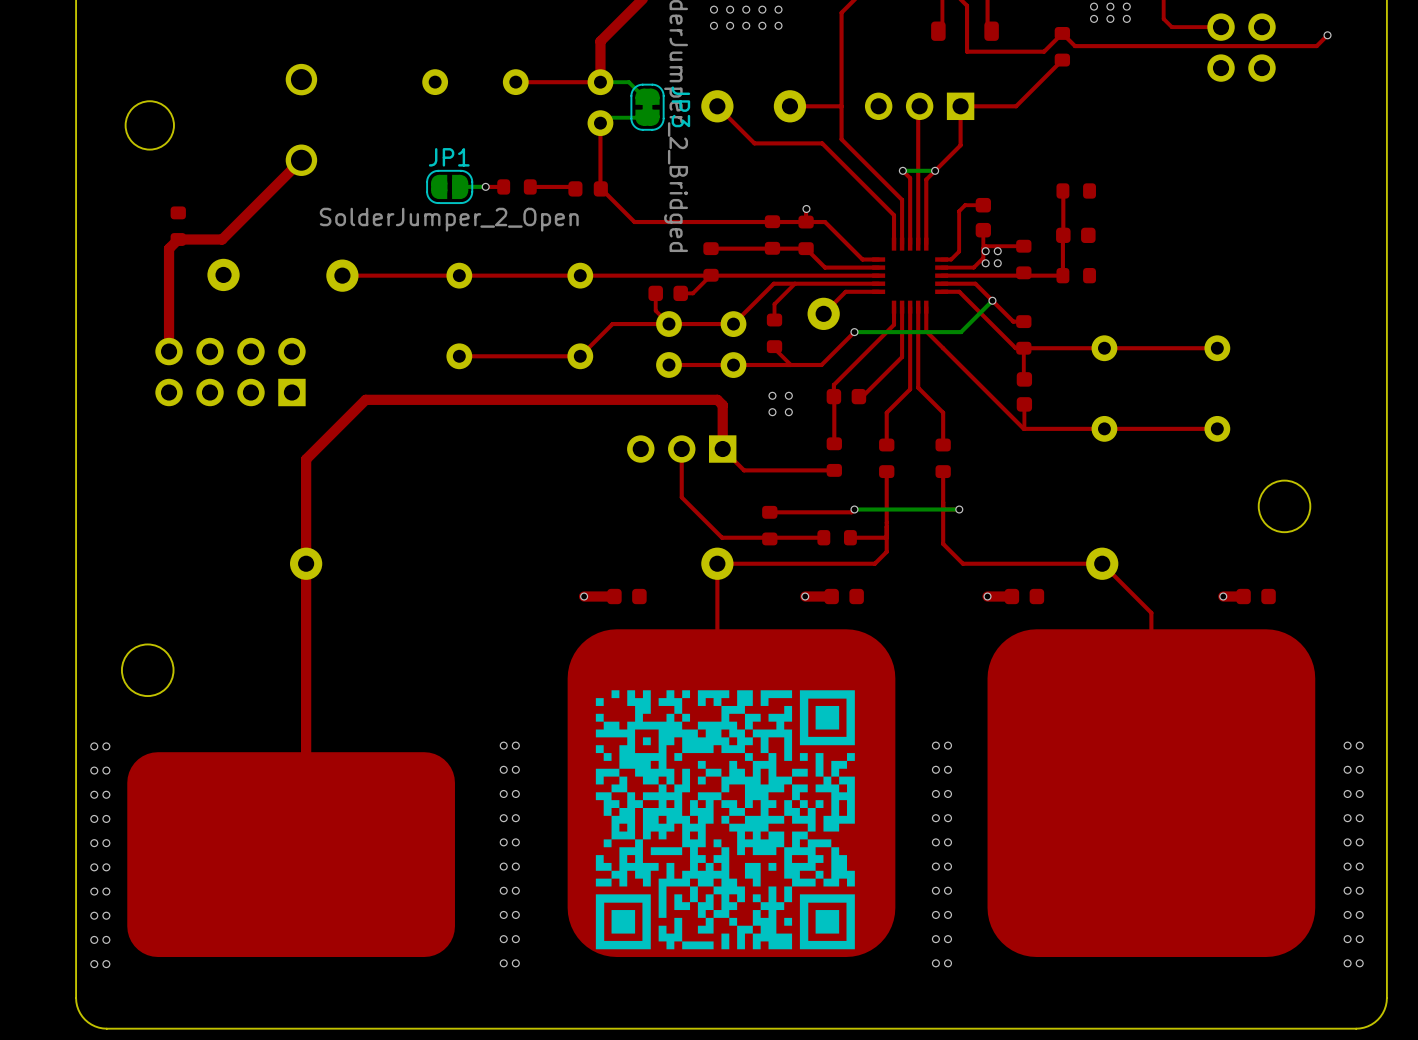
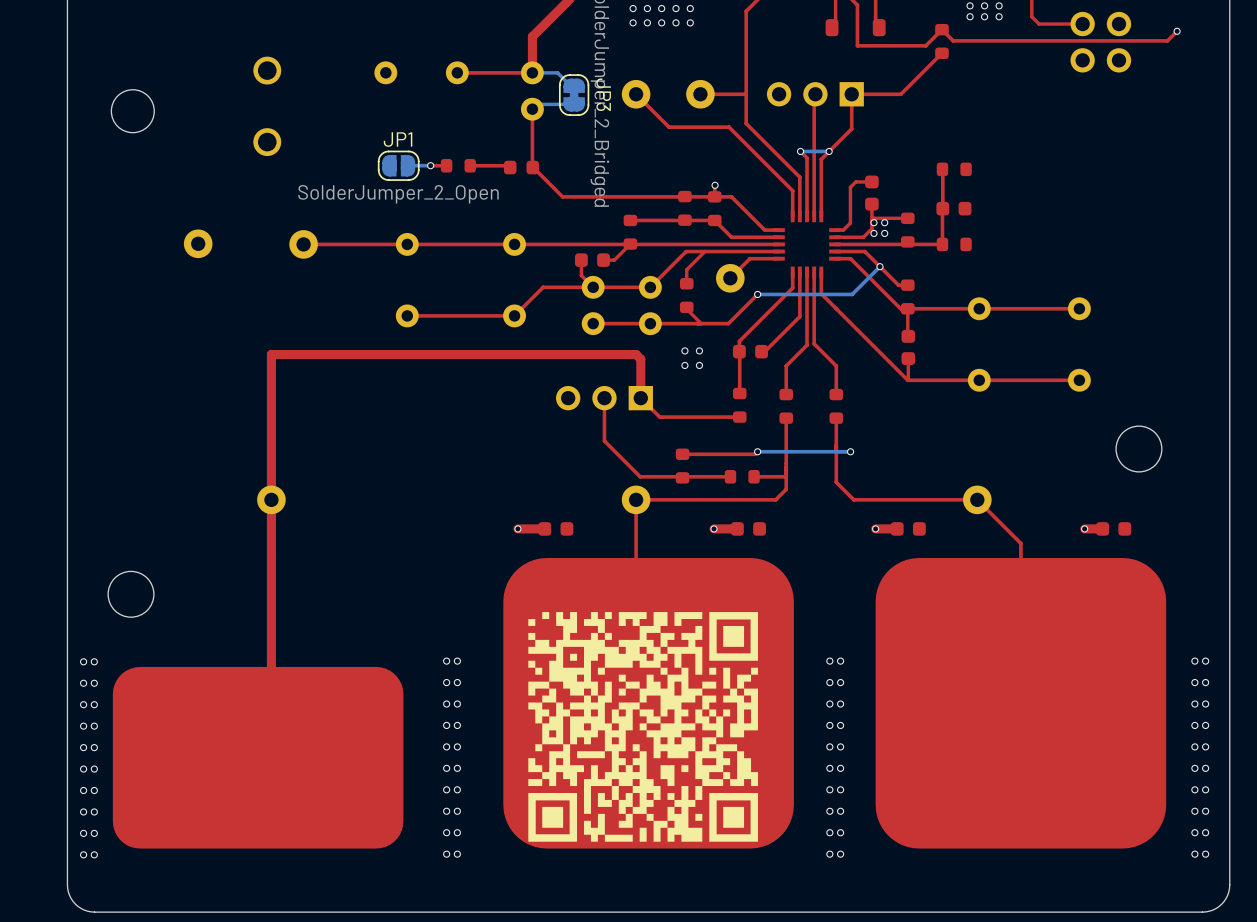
top track: (301, 160) (222, 239) (178, 239) (169, 248) (169, 351) -> none
part: (178, 226) -> none
part: (230, 372) -> none
top track: (365, 399) (306, 459) -> (324, 354) (271, 354) (271, 407)

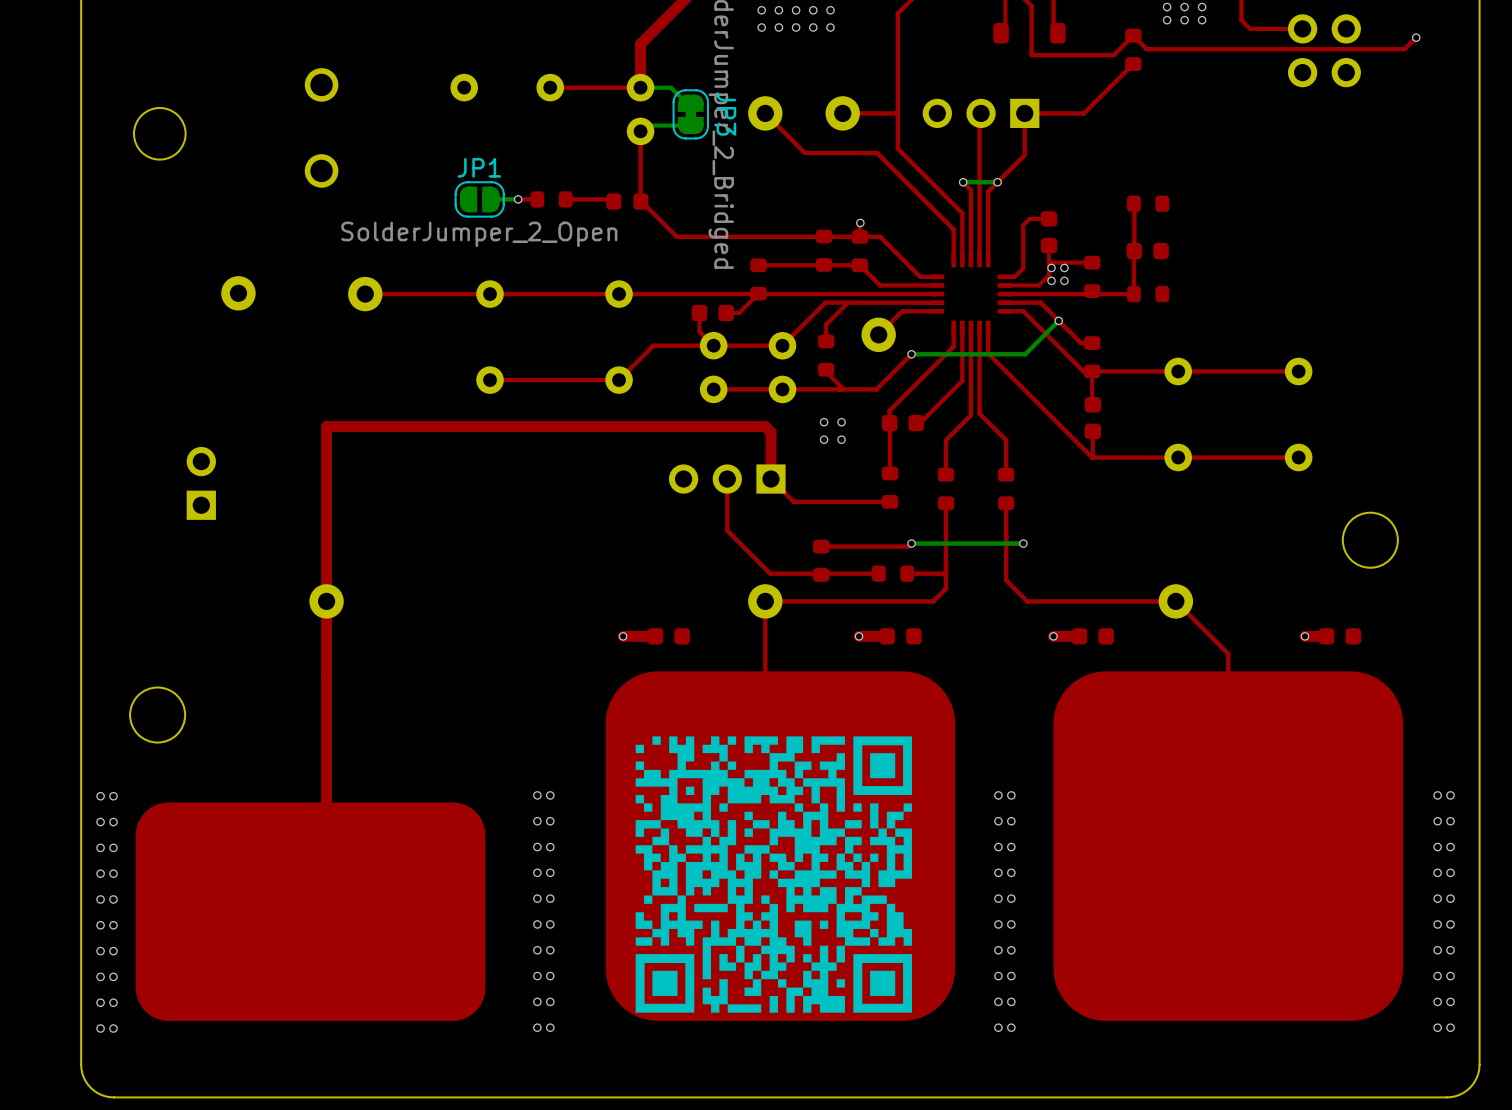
part: none -> (201, 483)

